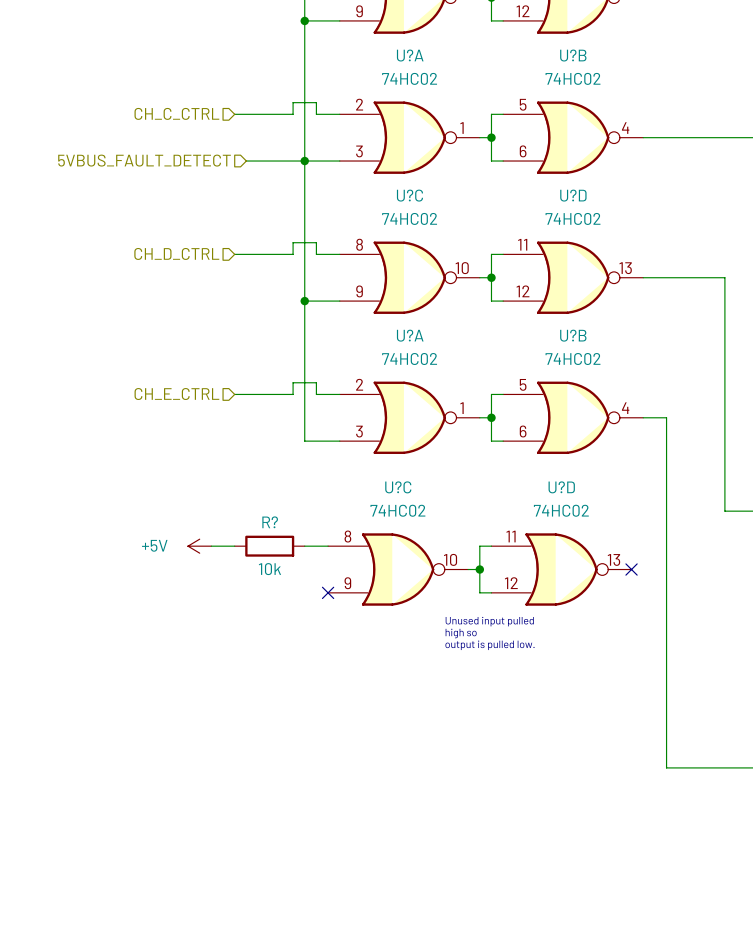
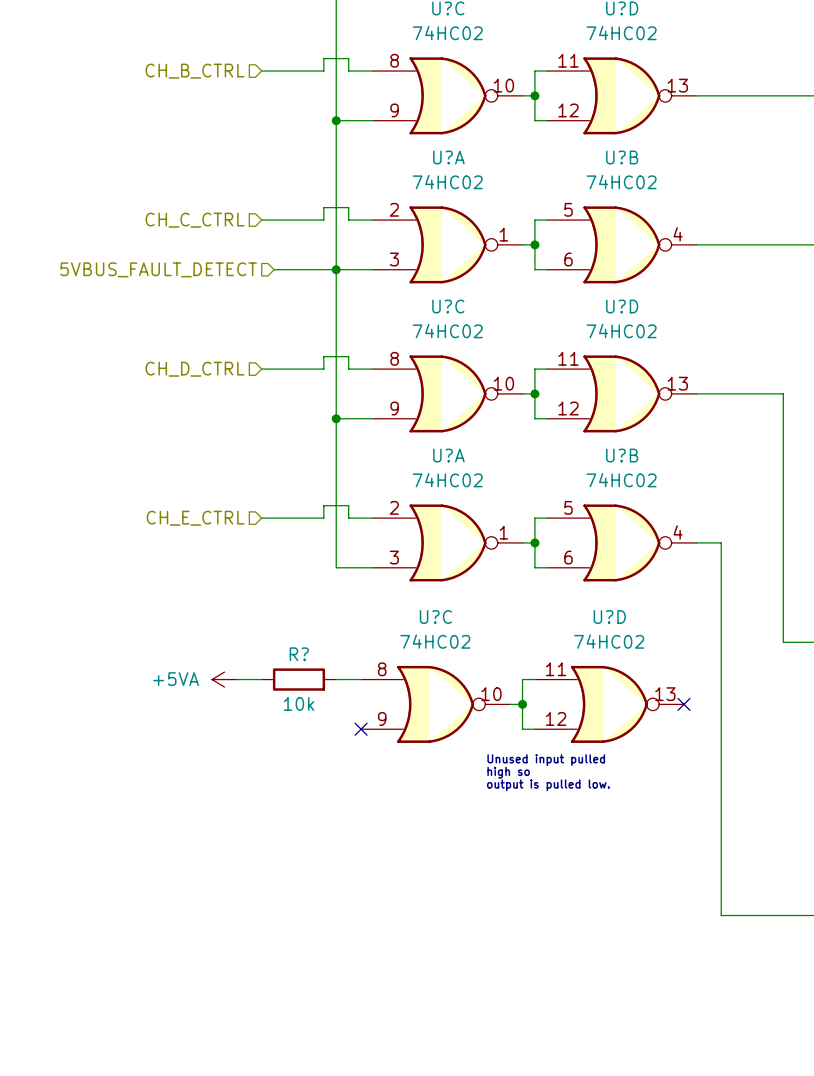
power symbol: +5V (199, 546) -> +5VA (224, 679)

